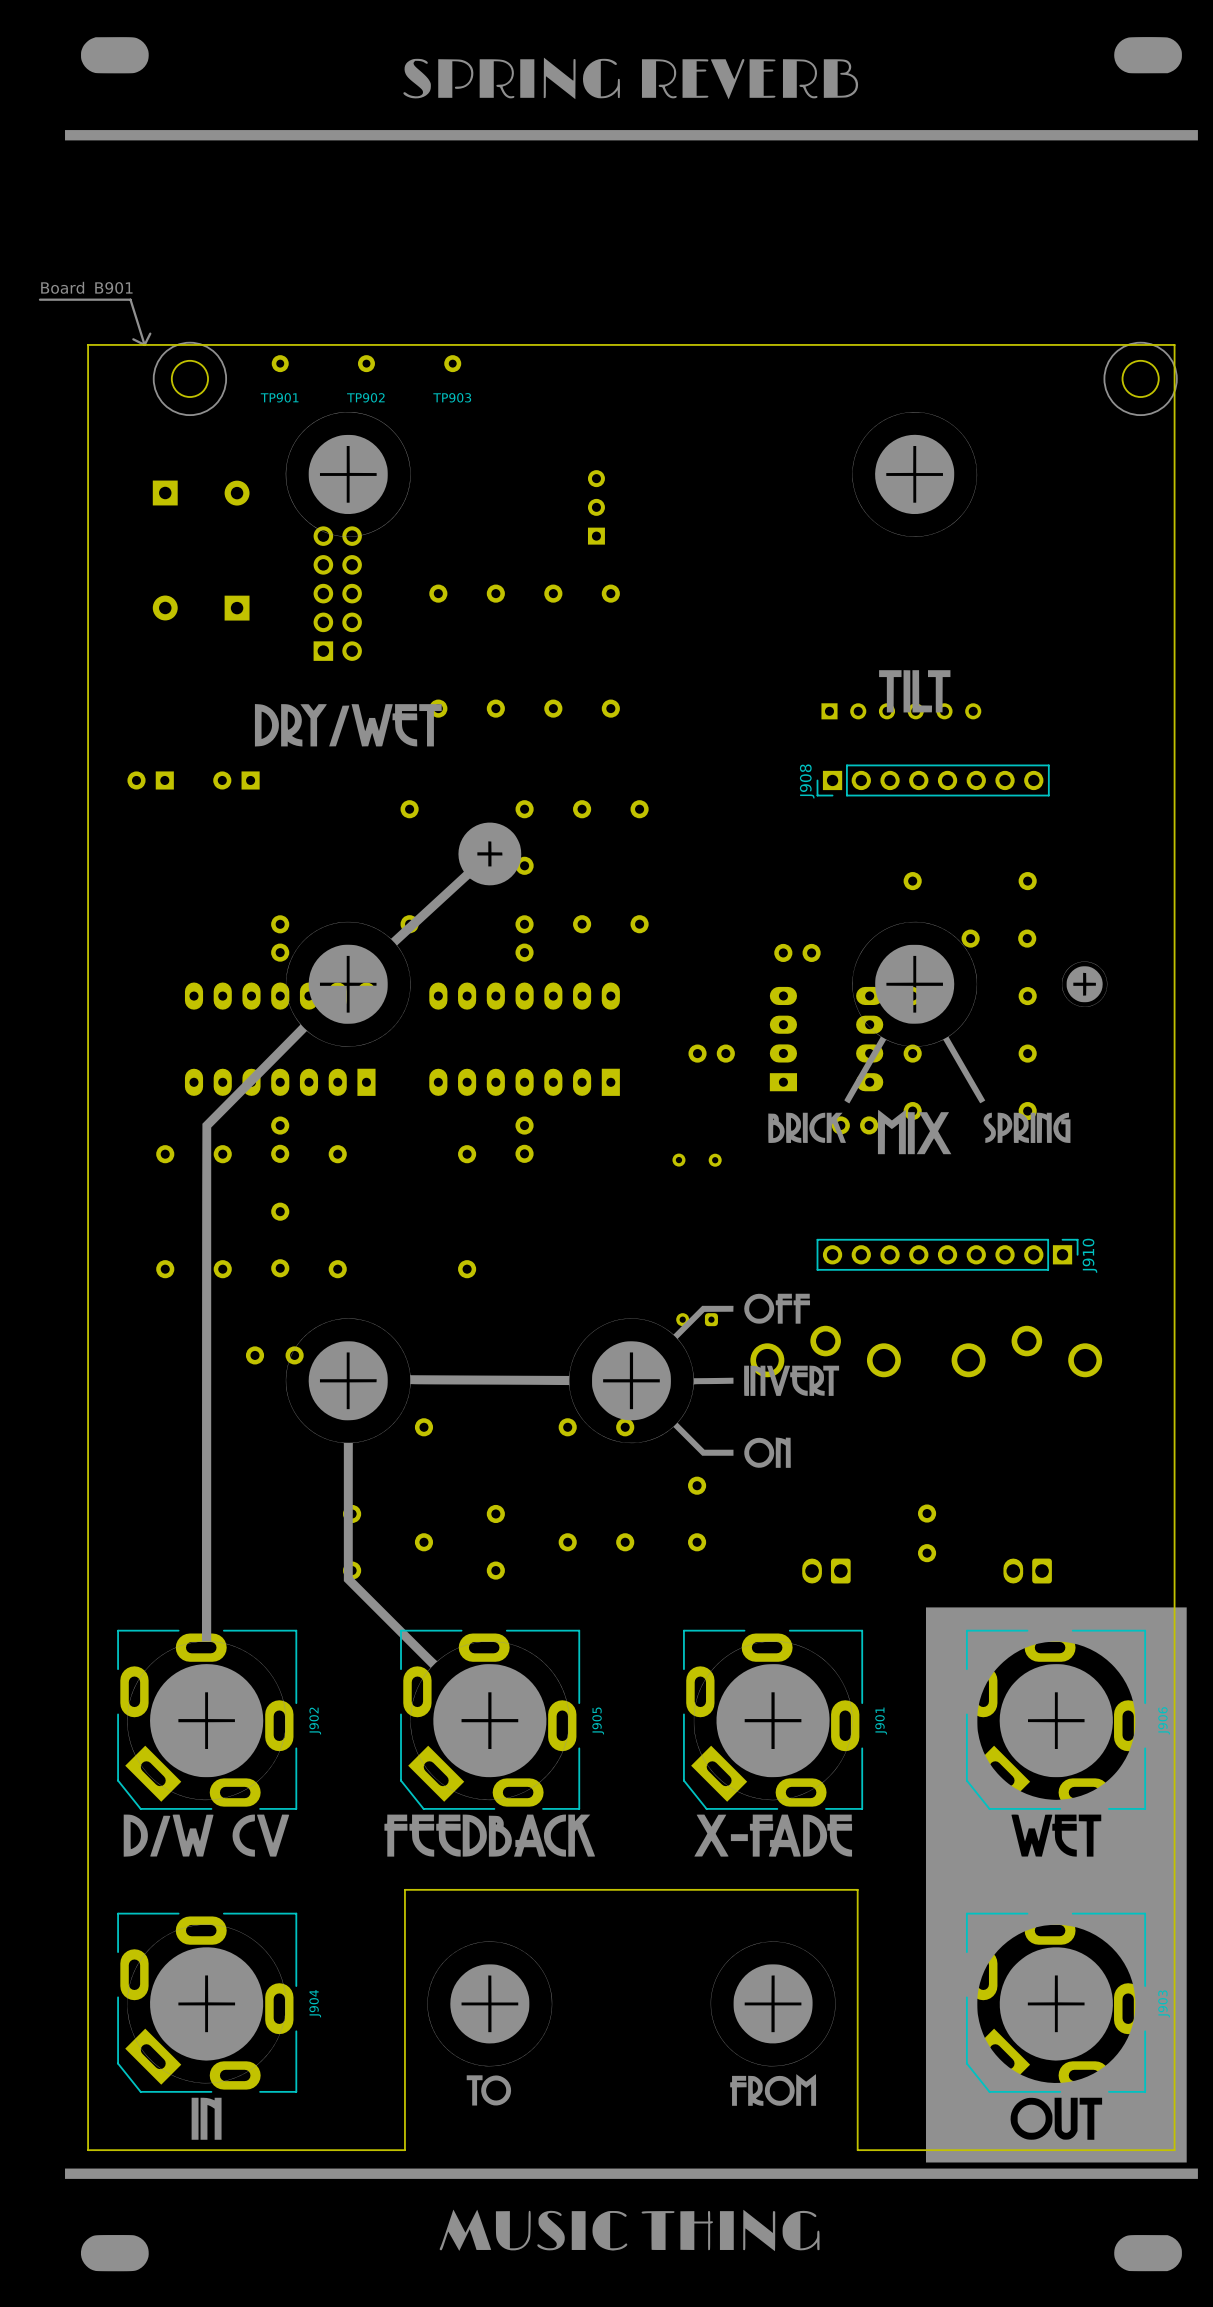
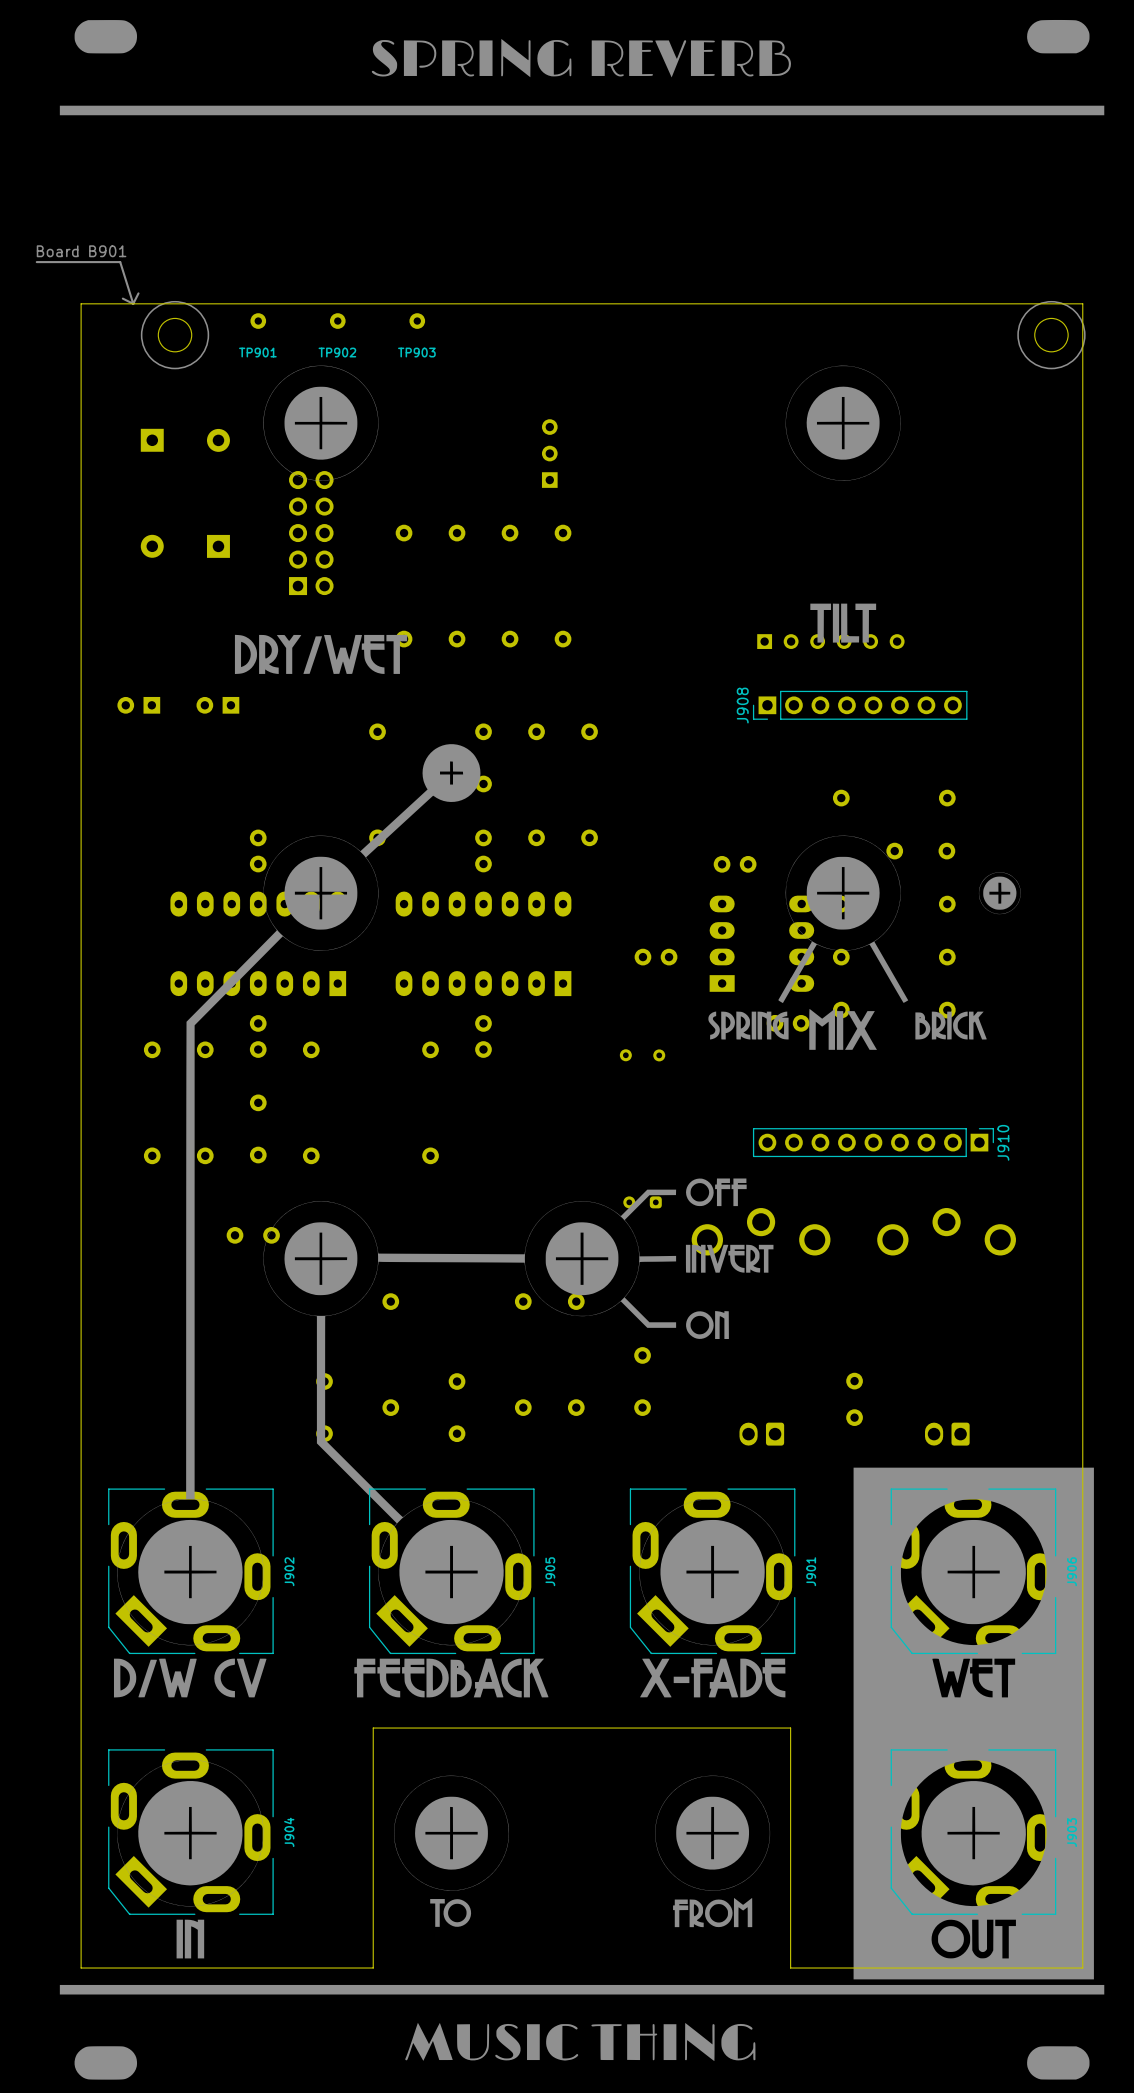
drawing shape: [65, 37, 1198, 2272] -> [59, 19, 1105, 2080]

